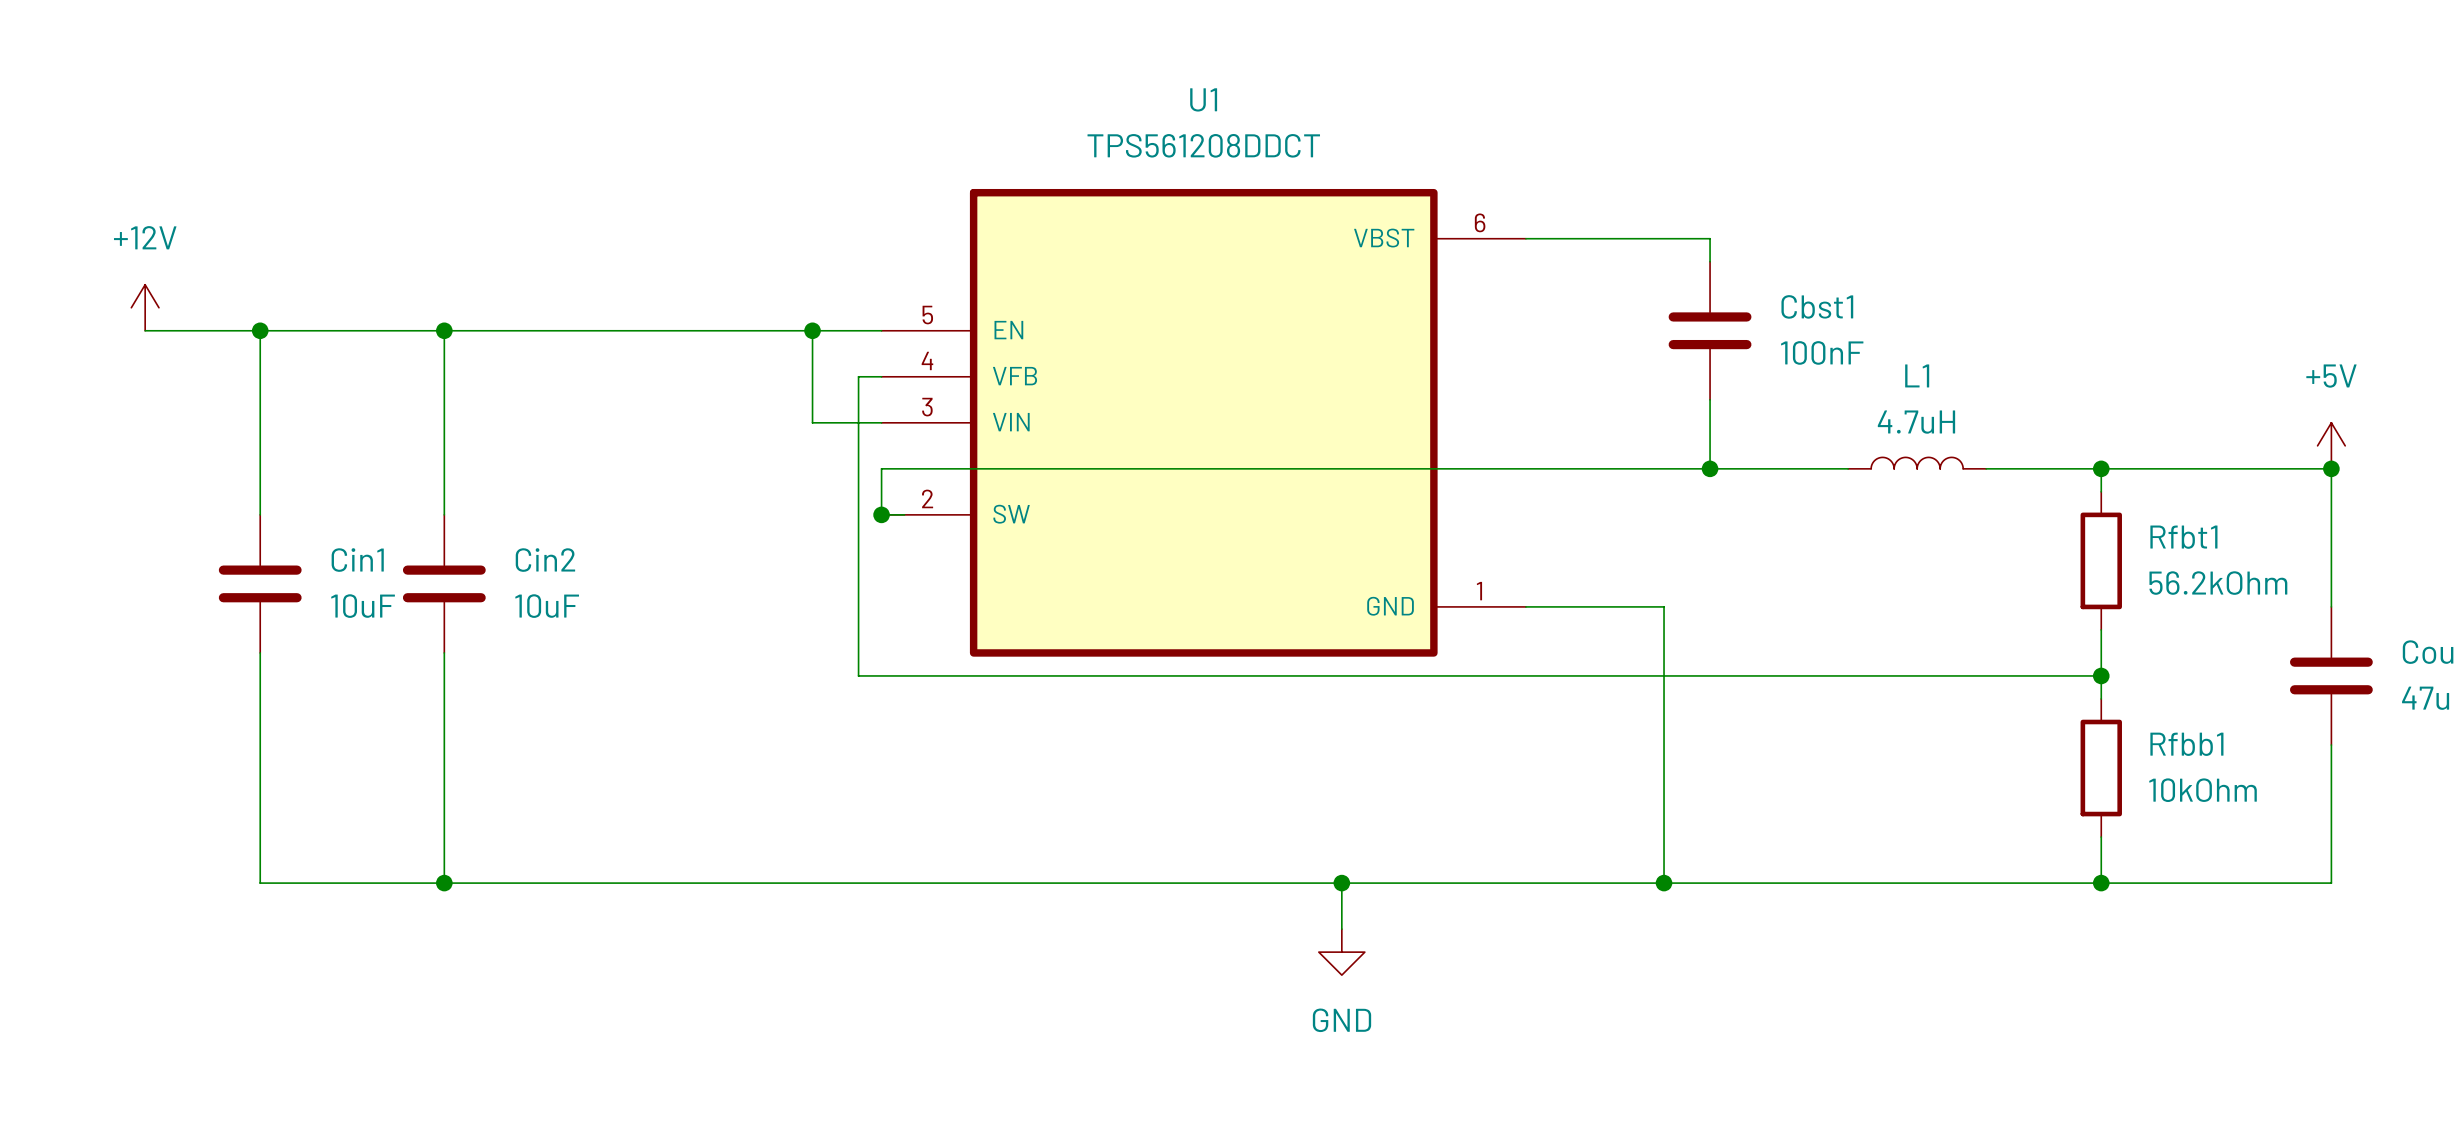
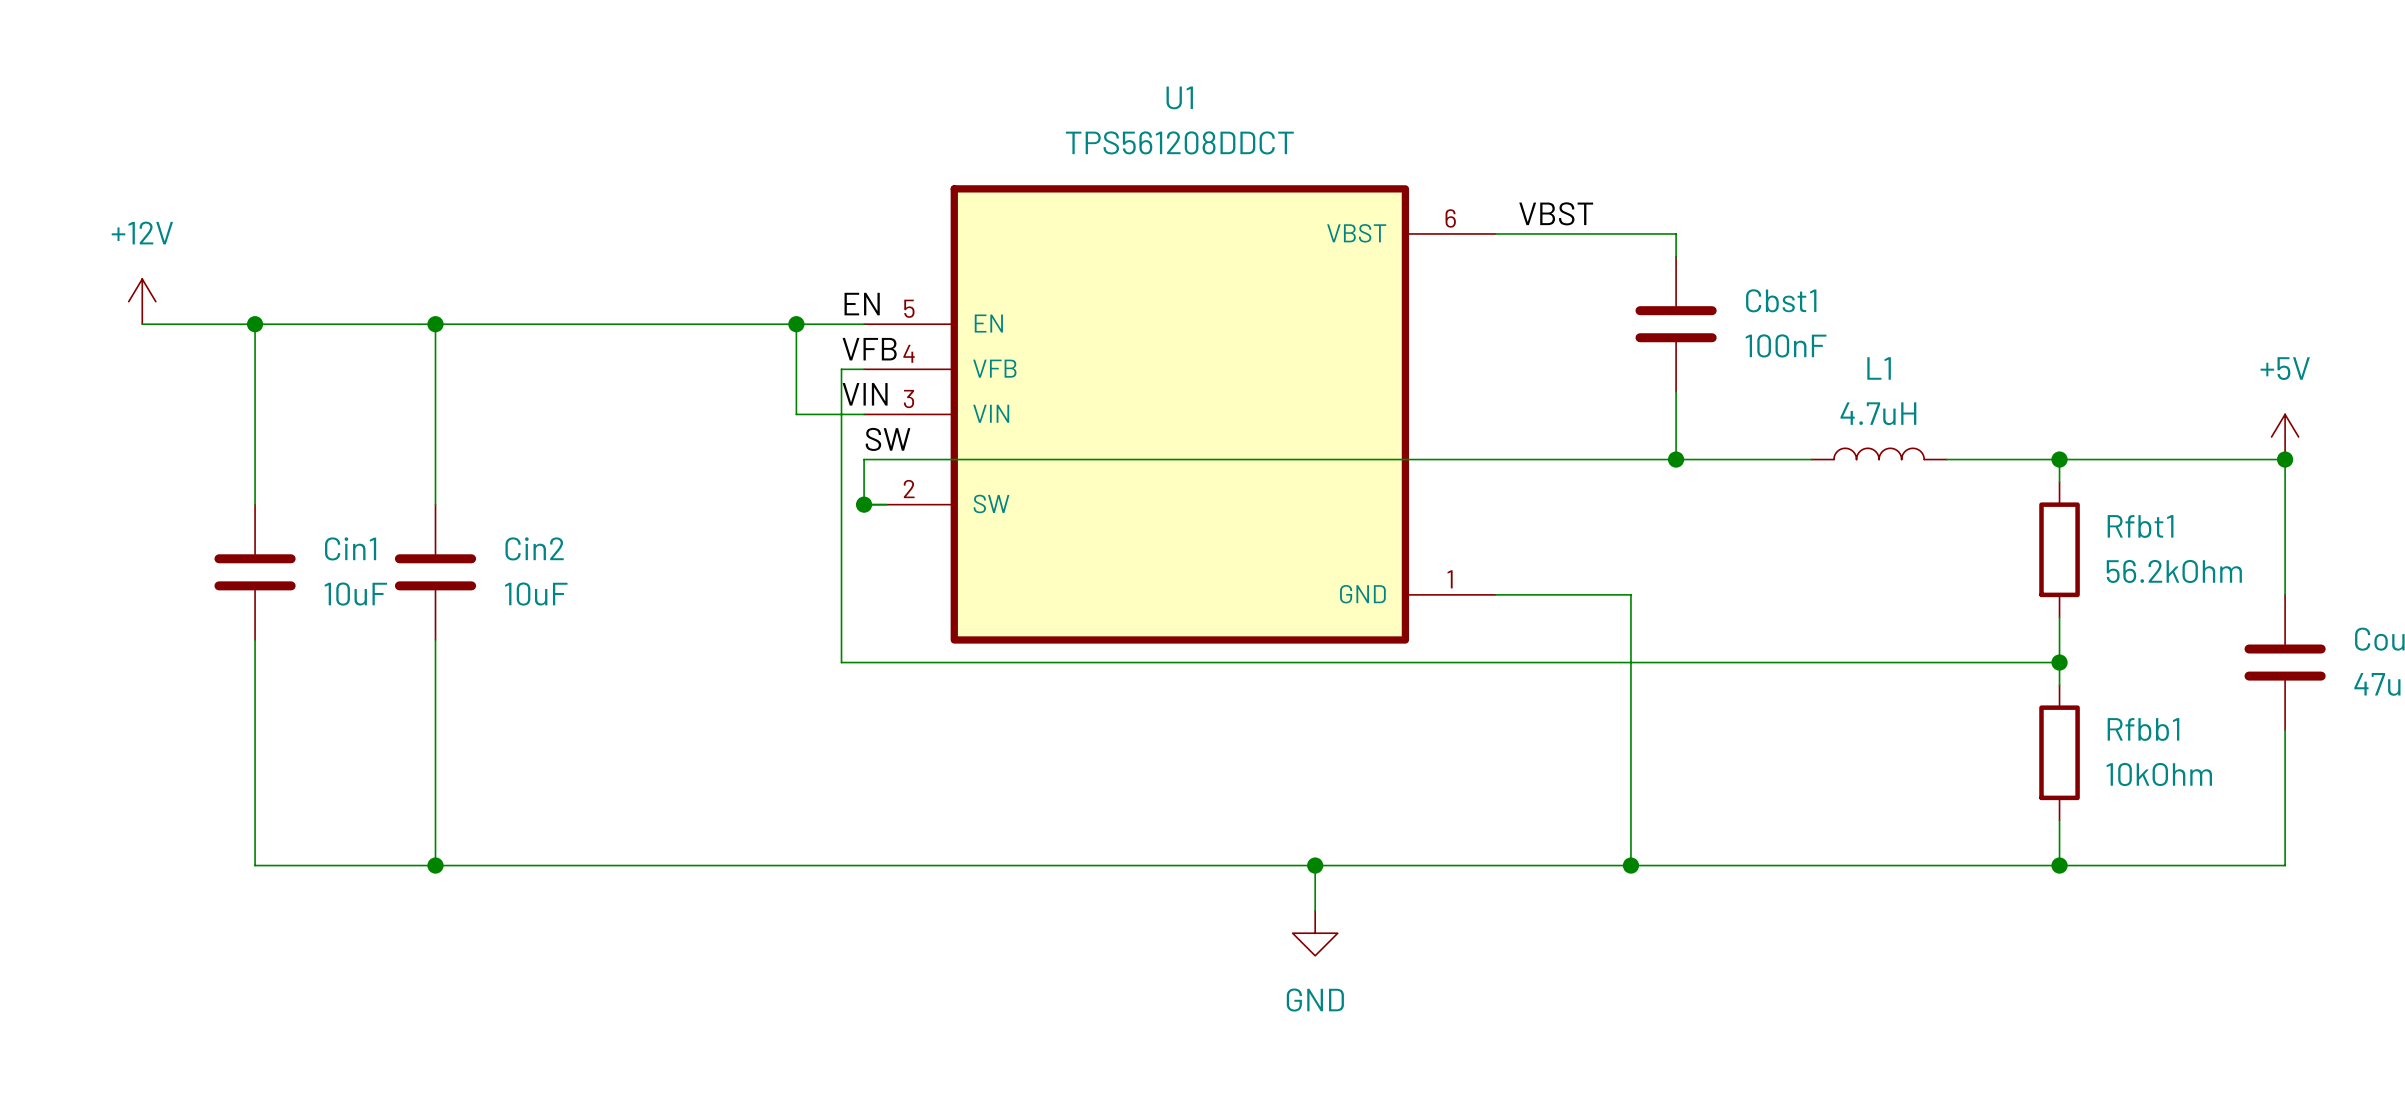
label: none -> VBST (1556, 213)
label: none -> EN (862, 304)
label: none -> VFB (869, 349)
label: none -> VIN (865, 394)
label: none -> SW (888, 439)

